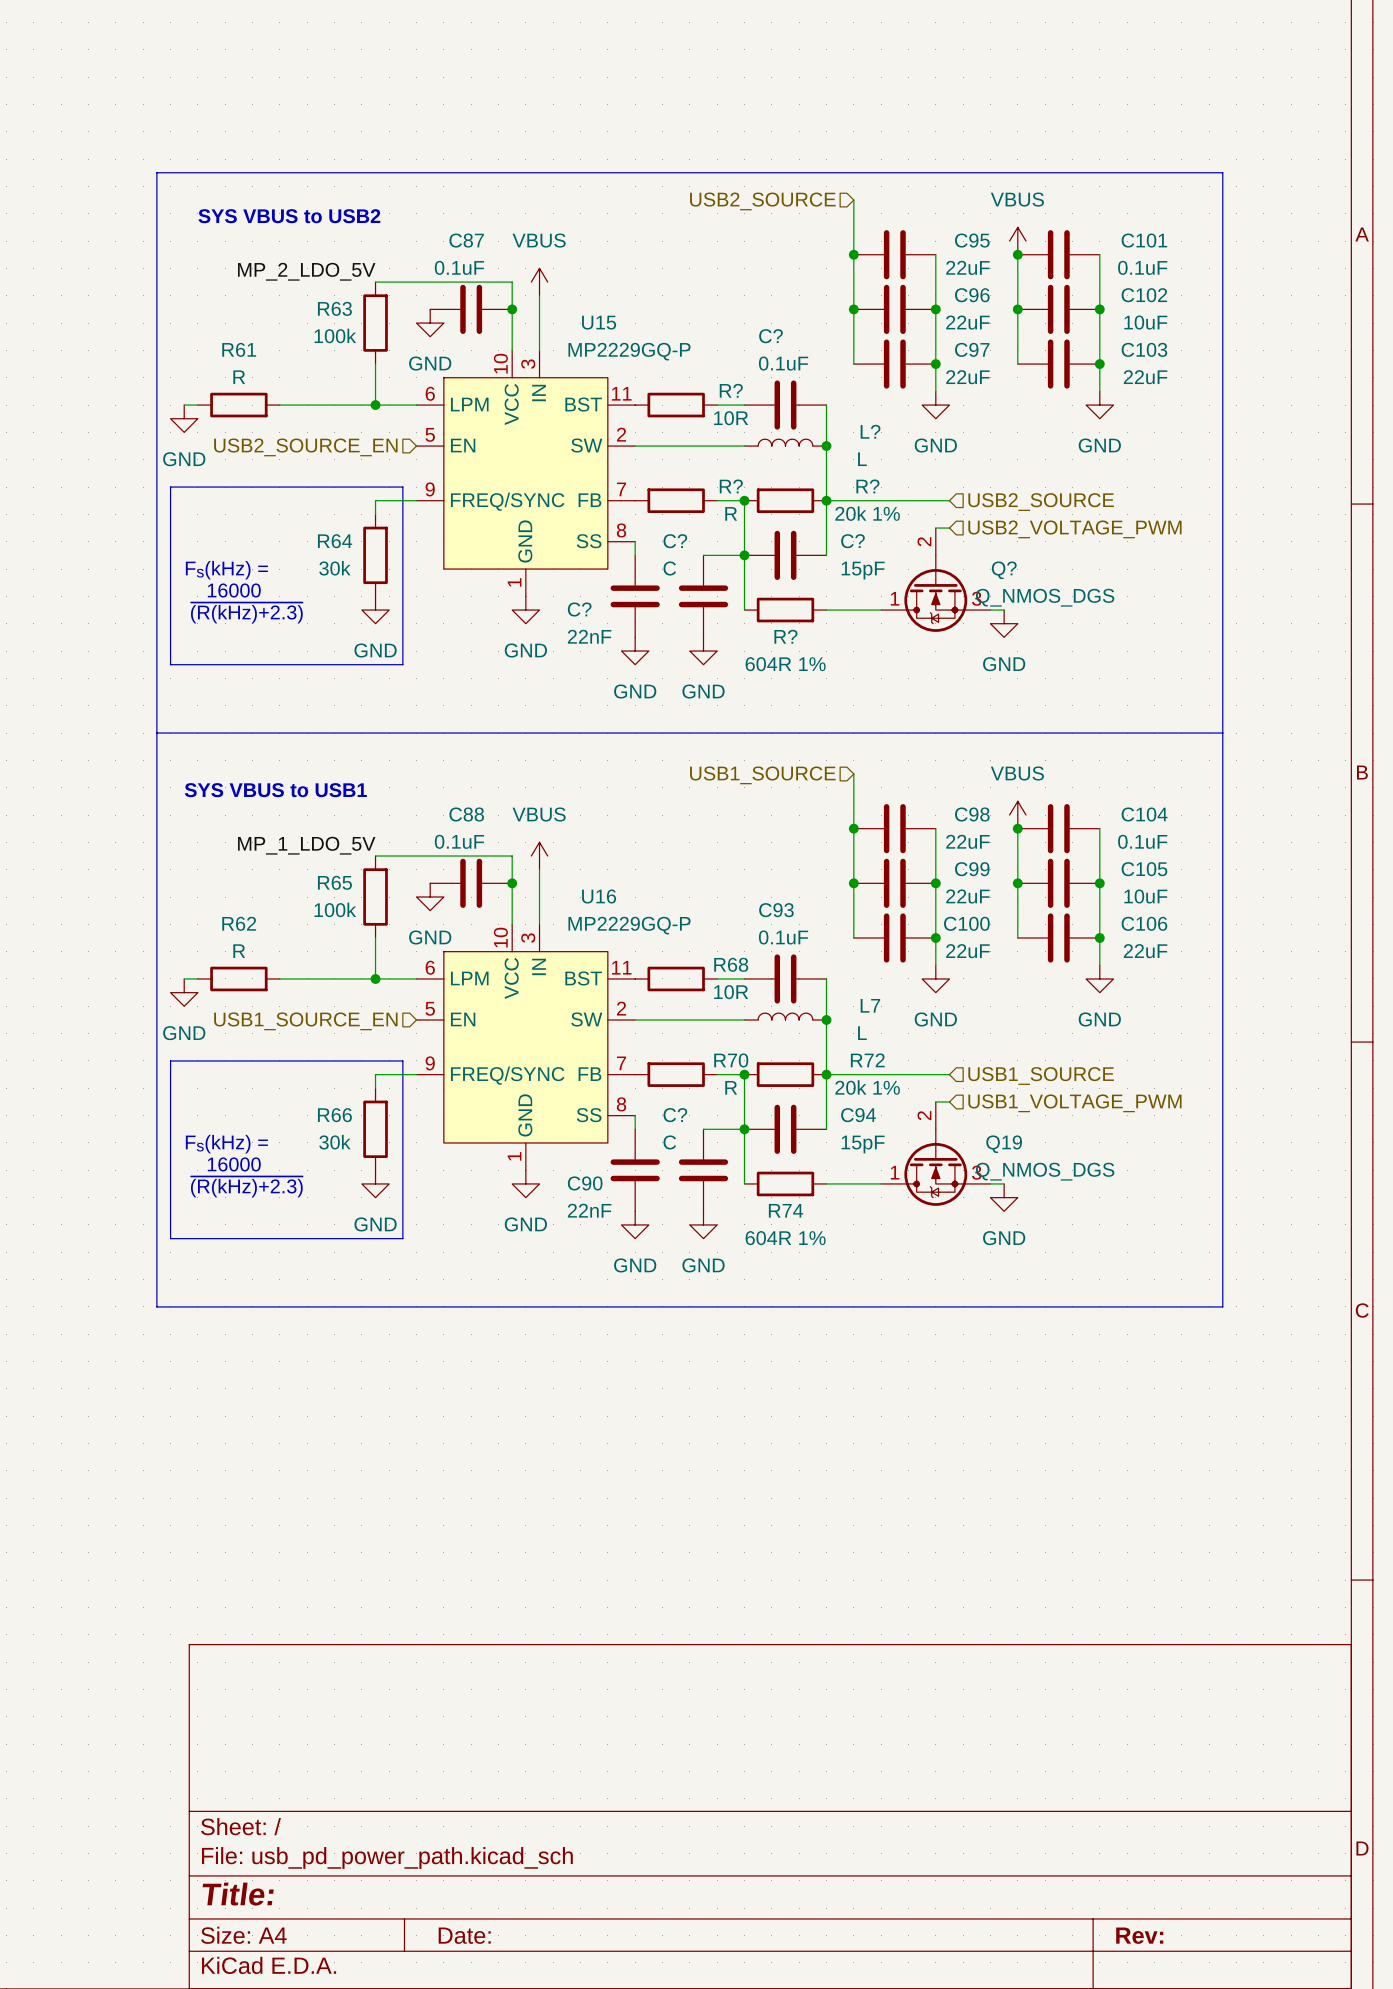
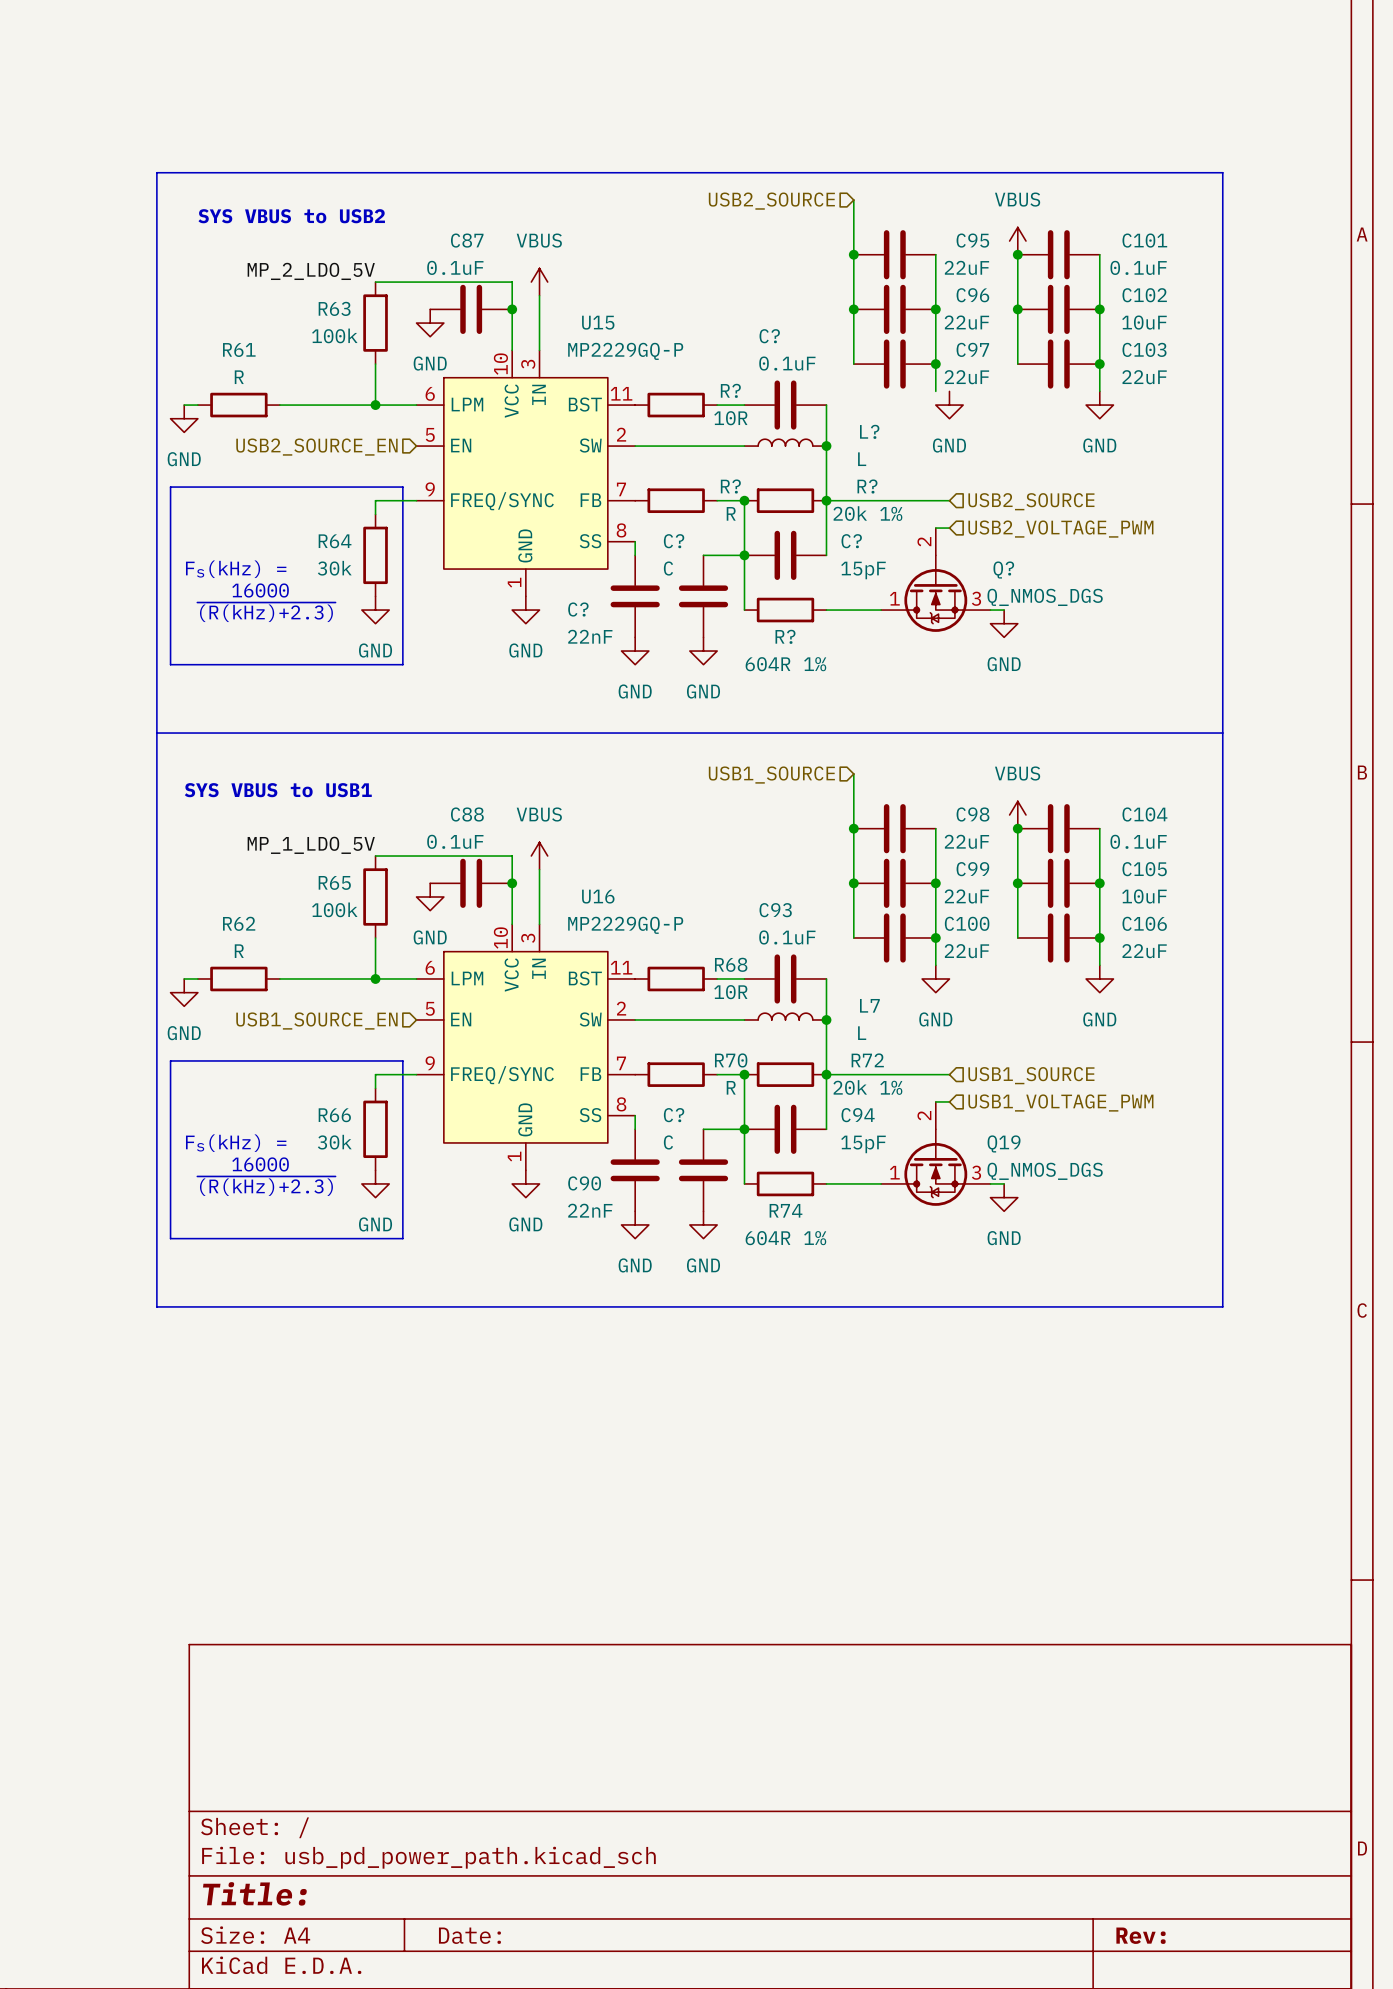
power symbol position: GND (935, 405) -> GND (949, 405)

